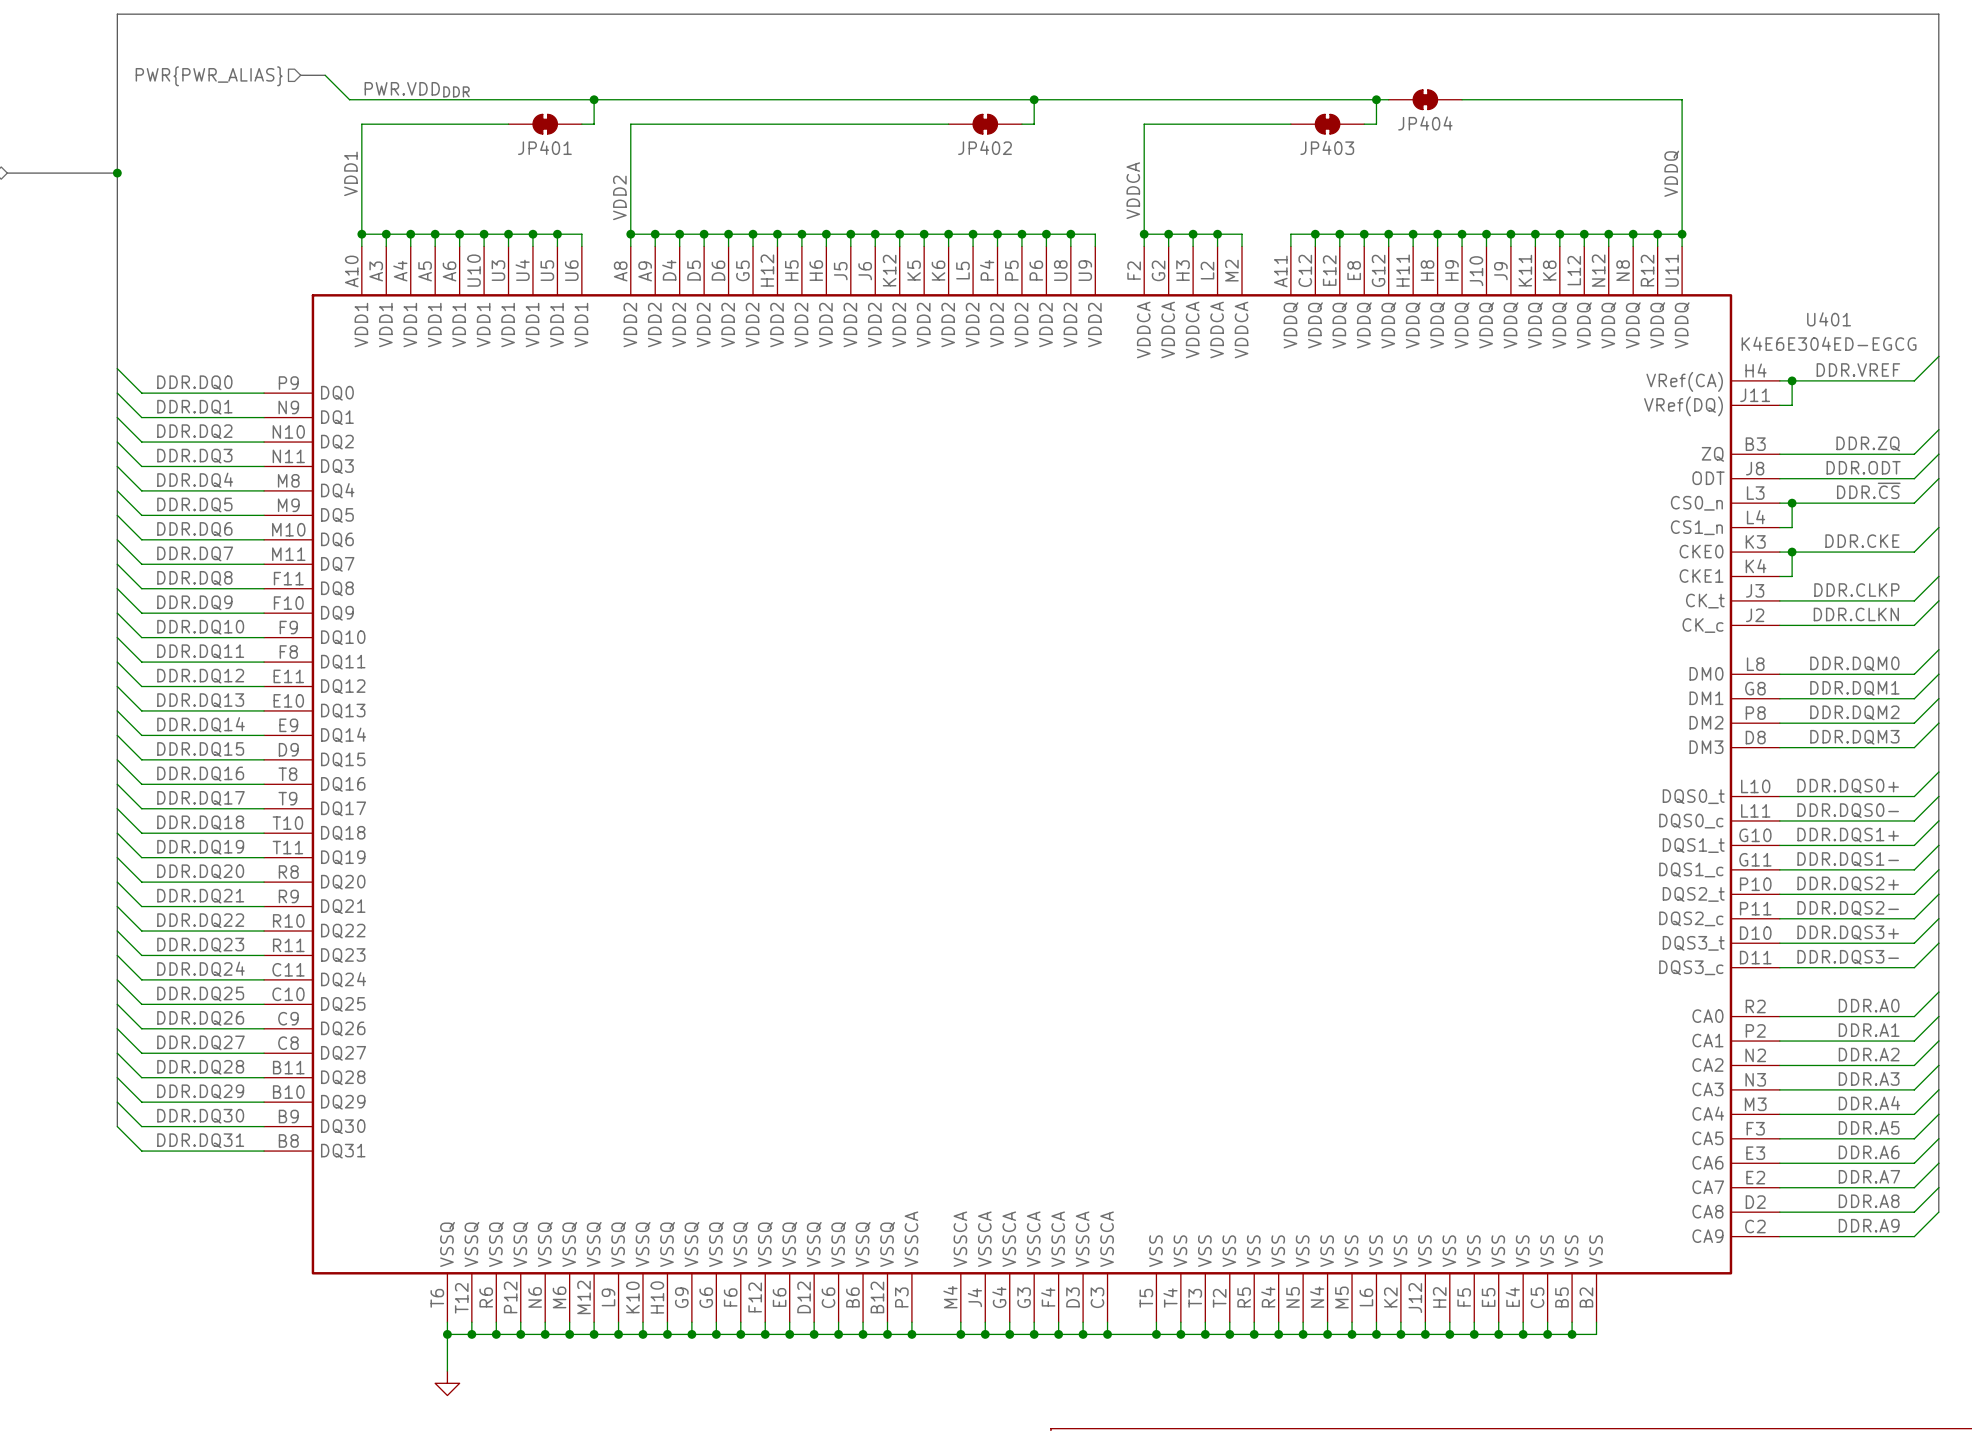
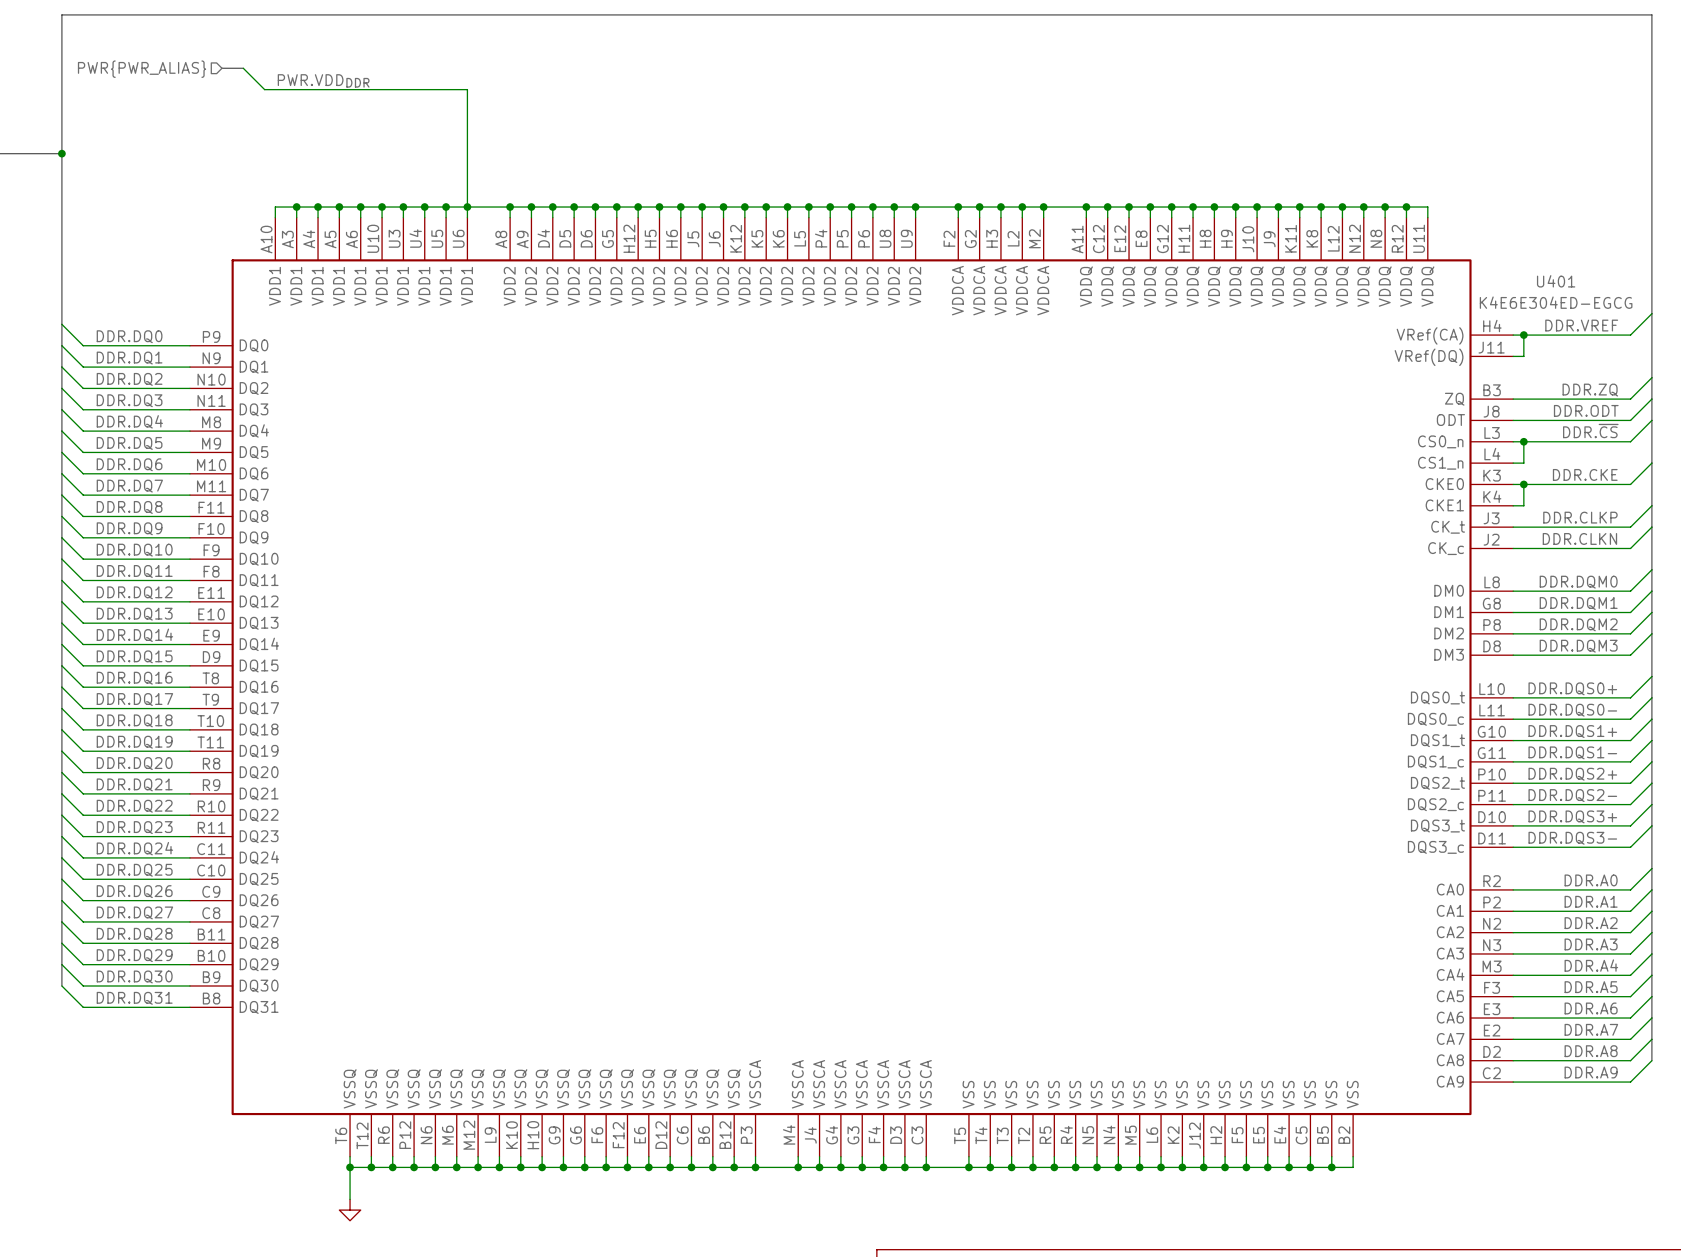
wire: (581, 99) (1388, 99) -> none
wire: (594, 99) (594, 124) (581, 124) -> none
junction: (594, 99) -> none
wire: (1034, 99) (1034, 124) (1021, 124) -> none
junction: (1034, 99) -> none
wire: (1376, 99) (1376, 124) (1364, 124) -> none
junction: (1376, 99) -> none
JP404: (1425, 99) -> none
wire: (1462, 99) (1682, 99) (1682, 234) -> none
wire: (508, 124) (361, 124) (361, 234) -> none
JP401: (545, 124) -> none
wire: (948, 124) (630, 124) (630, 234) -> (467, 89) (467, 207) (510, 207)
JP402: (985, 124) -> none
wire: (1290, 124) (1144, 124) (1144, 234) -> (915, 207) (958, 207)
JP403: (1327, 124) -> none
label: VDD1 (350, 173) -> none
label: VDDQ (1671, 173) -> none
label: VDDCA (1133, 190) -> none
label: VDD2 (619, 197) -> none
junction: (361, 234) -> none
junction: none -> (467, 207)
junction: none -> (915, 207)
wire: none -> (1043, 207) (1086, 207)
junction: none -> (1043, 207)
junction: none -> (1086, 207)
junction: (1682, 234) -> none

